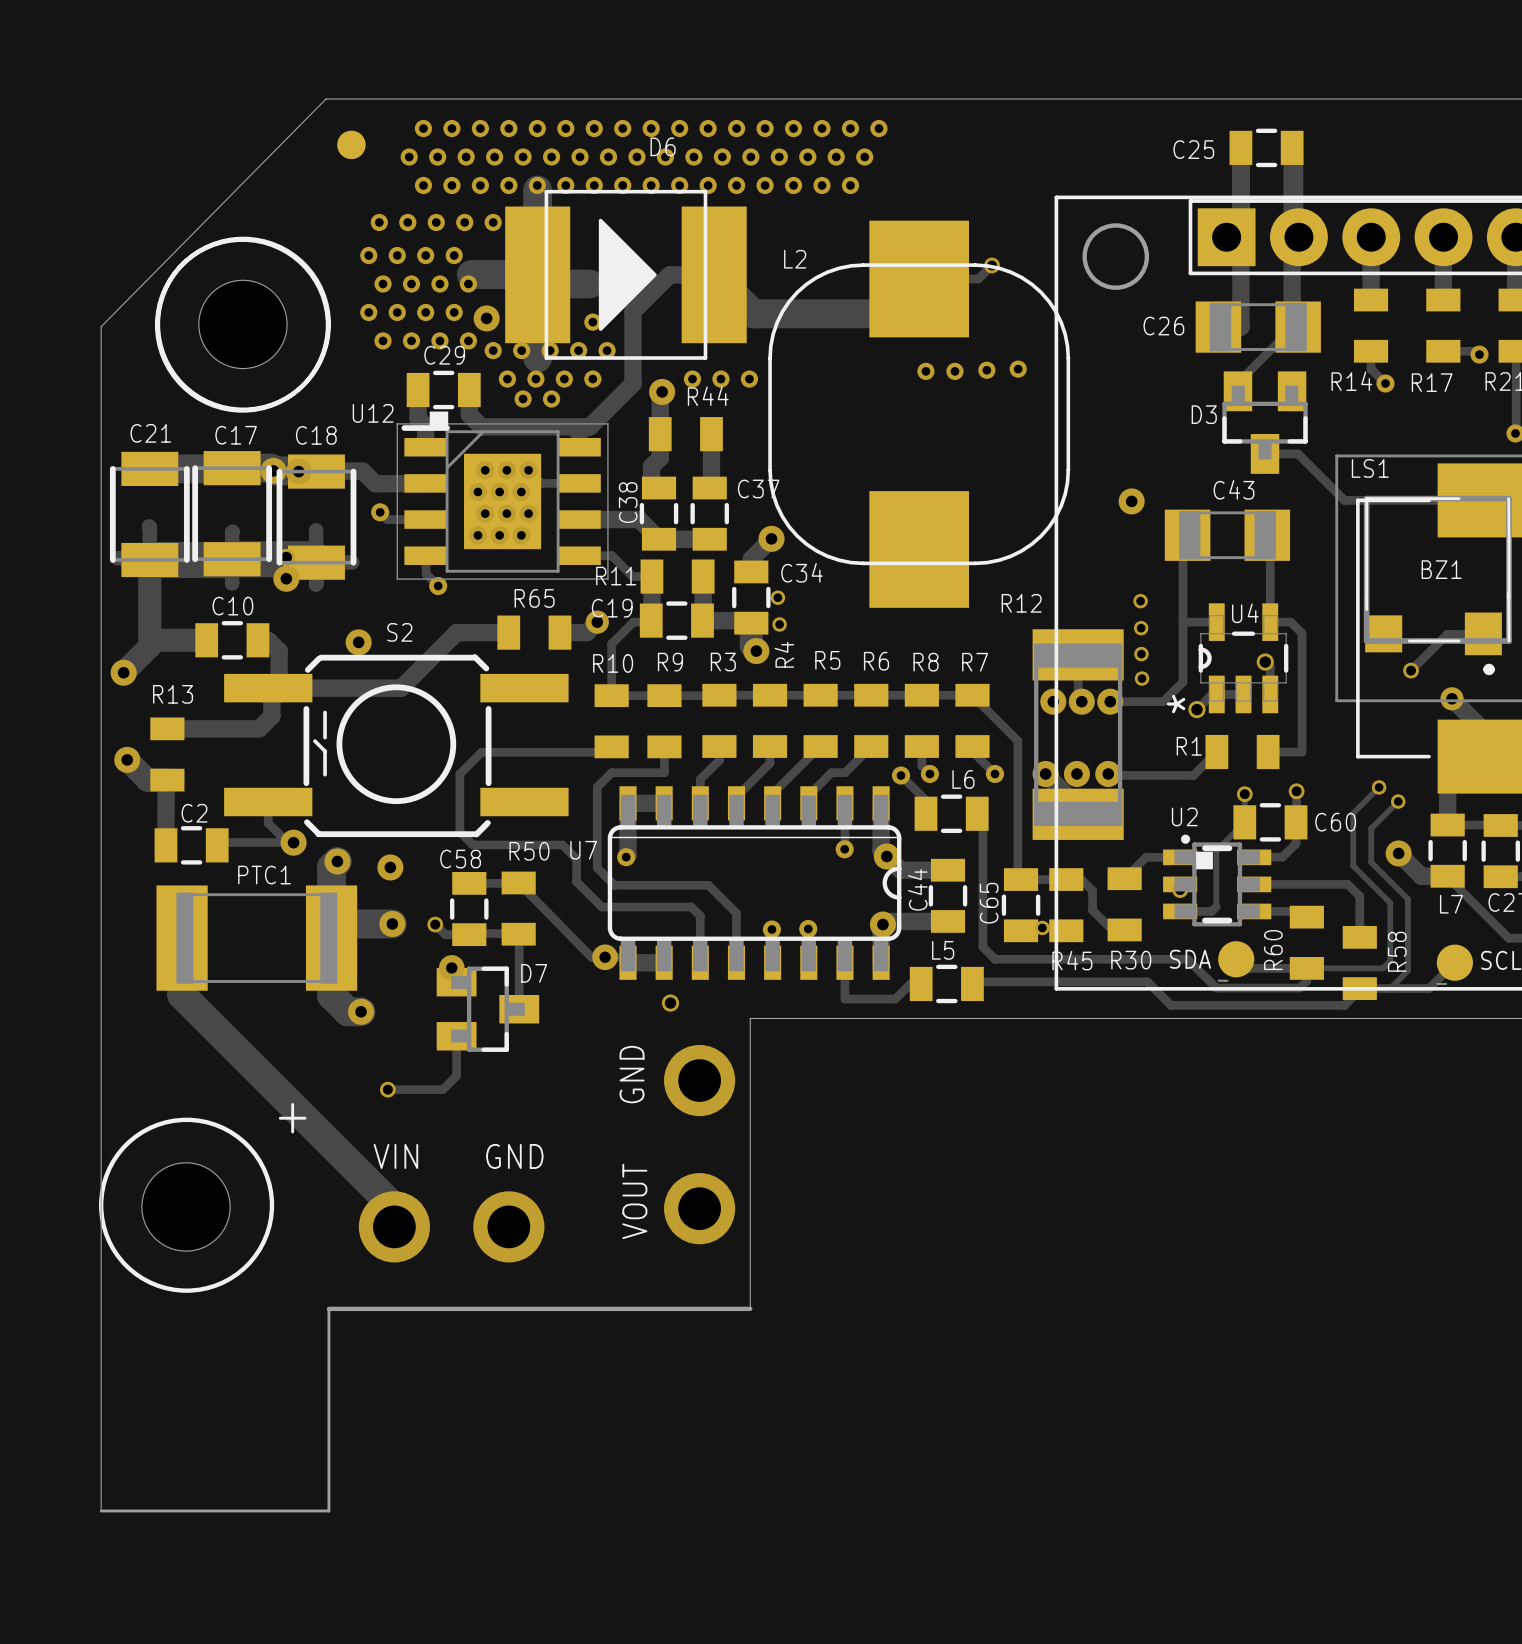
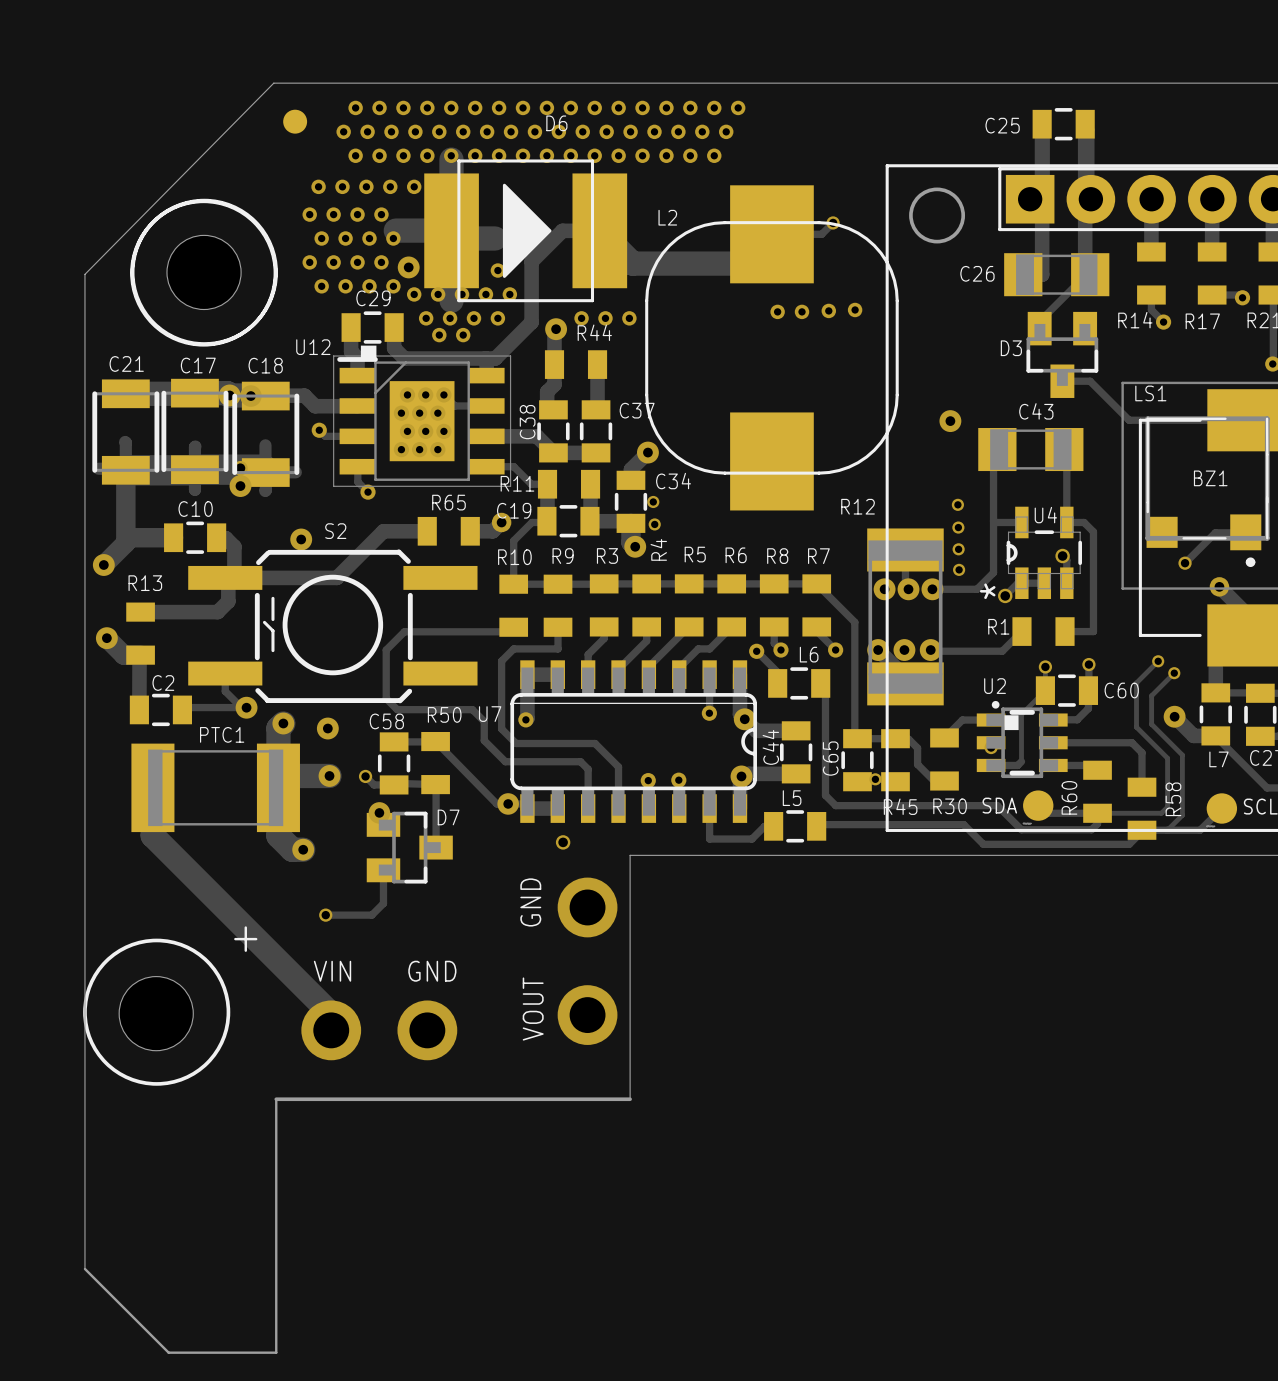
board edge: (101, 1511) (328, 1511) -> (84, 1268) (168, 1352) (276, 1352) (276, 1268)

